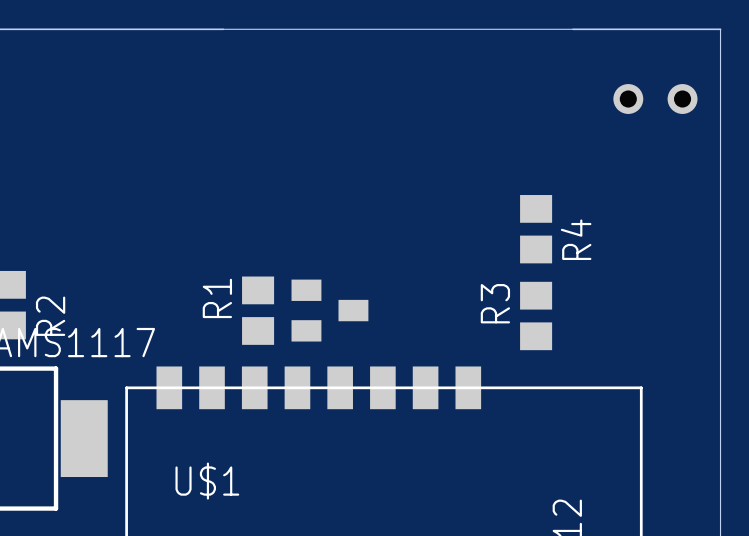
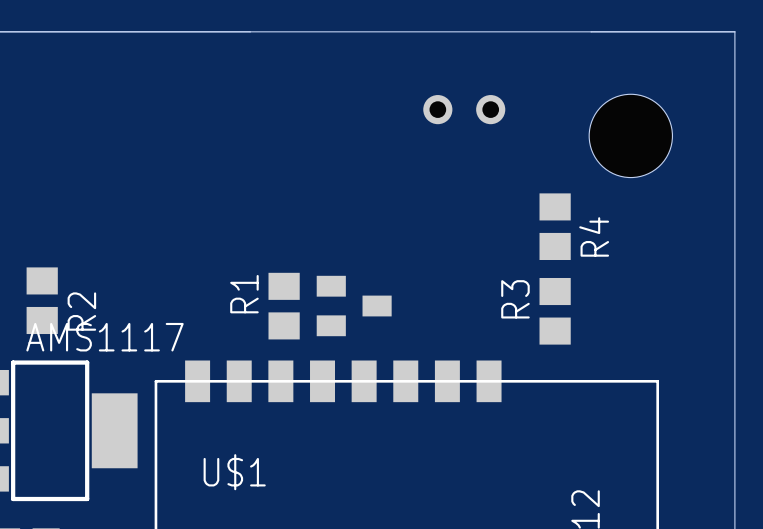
part position: (655, 99) -> (464, 109)
hole: none -> (630, 135)

